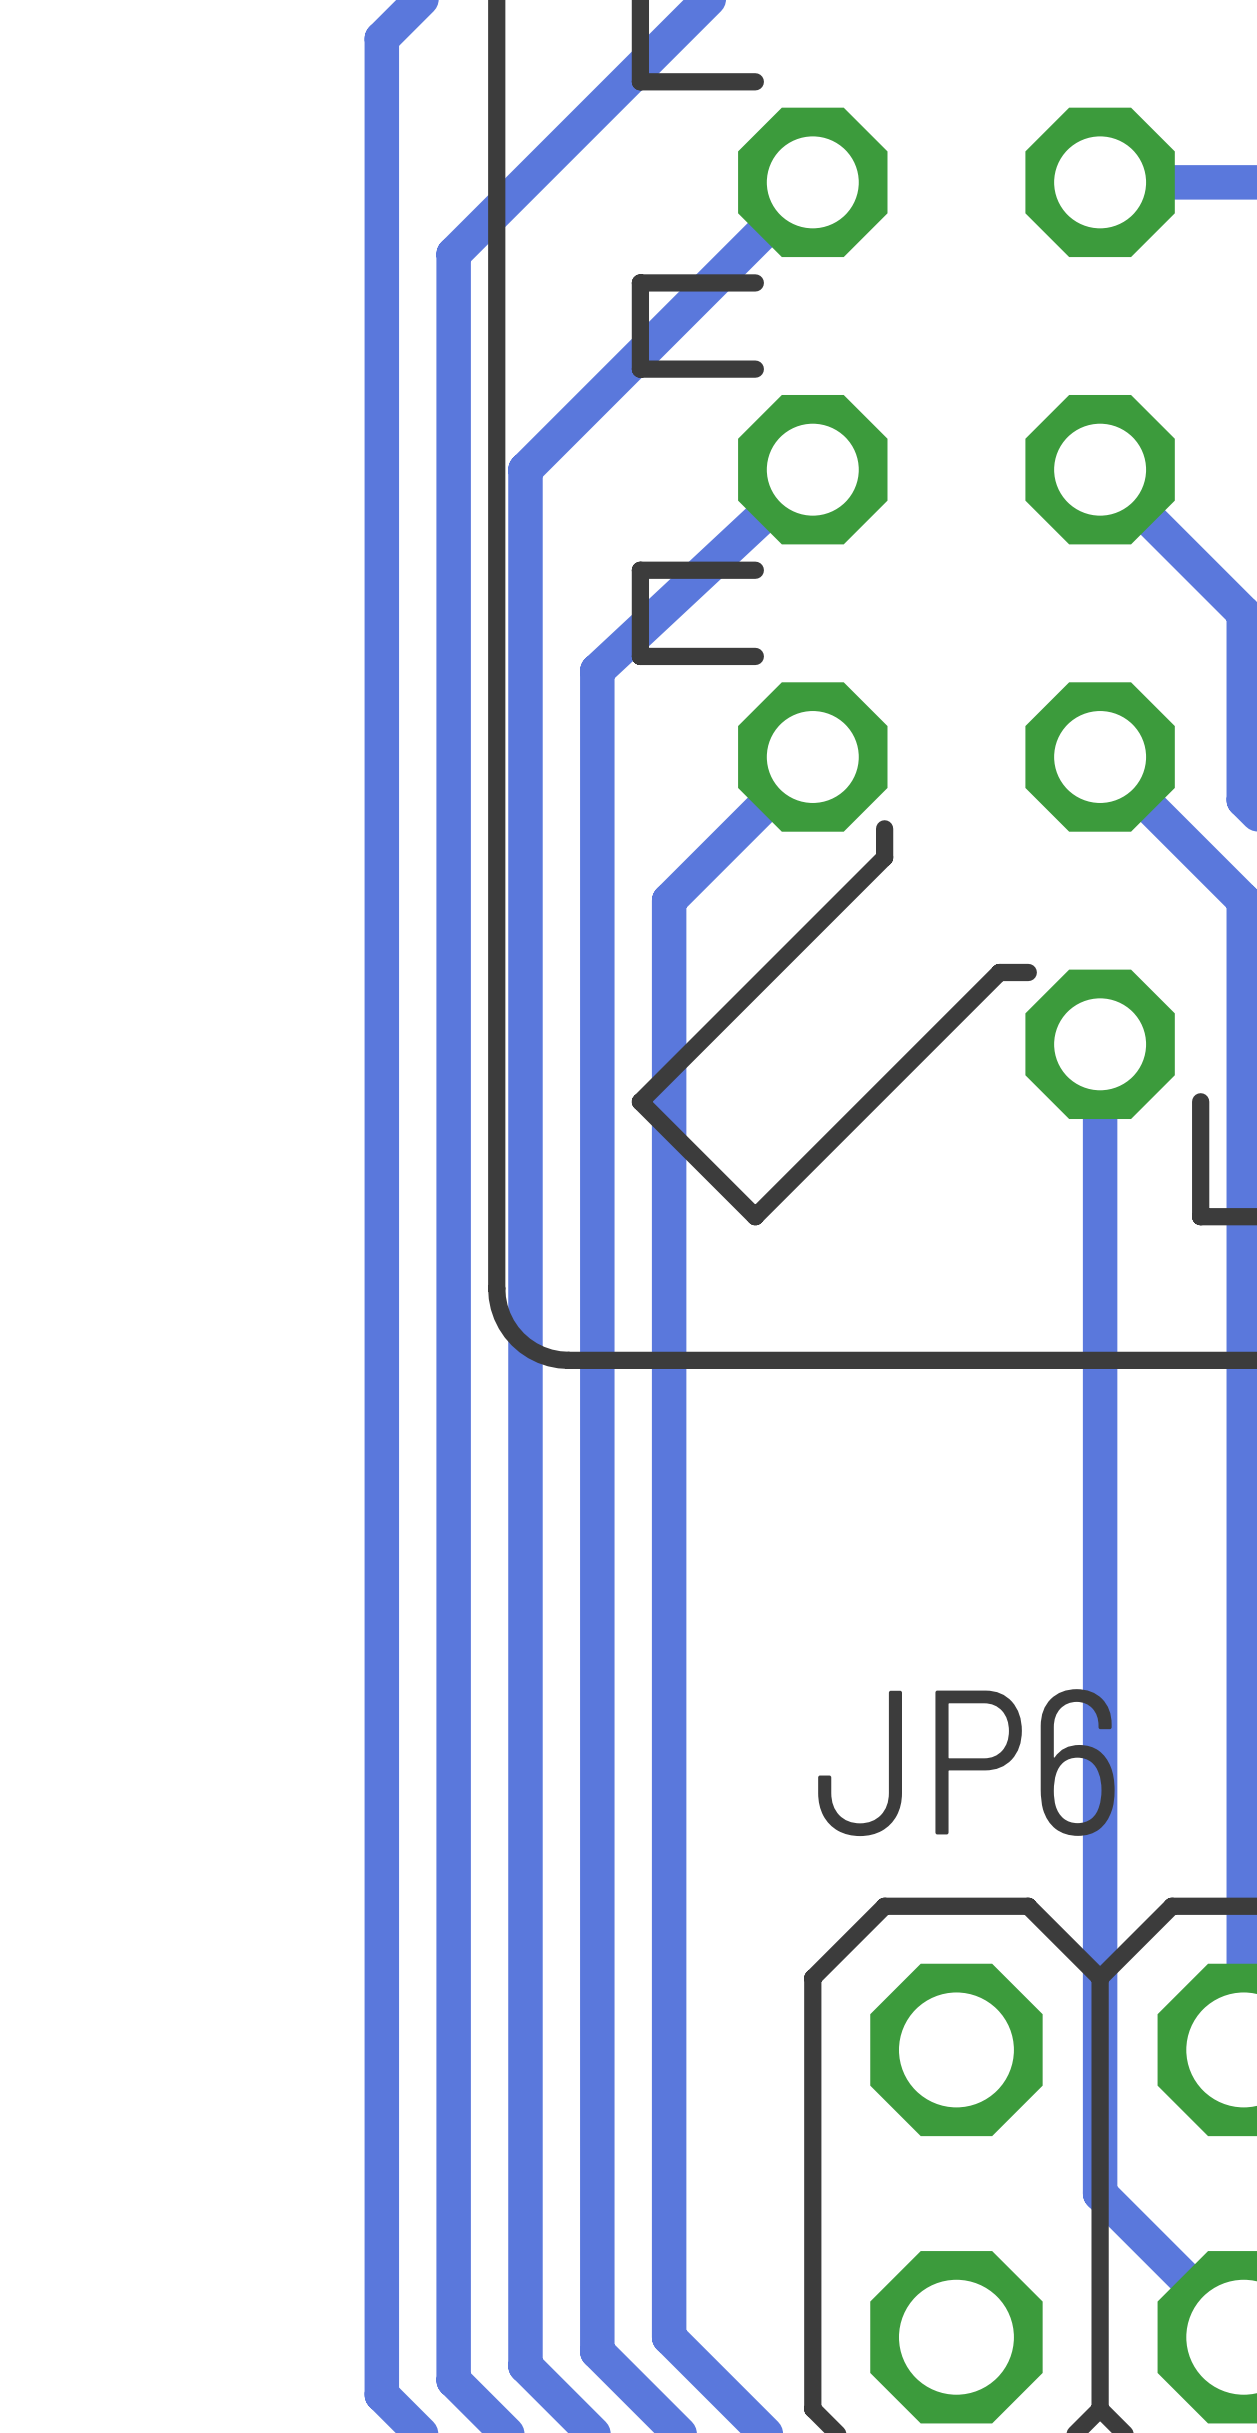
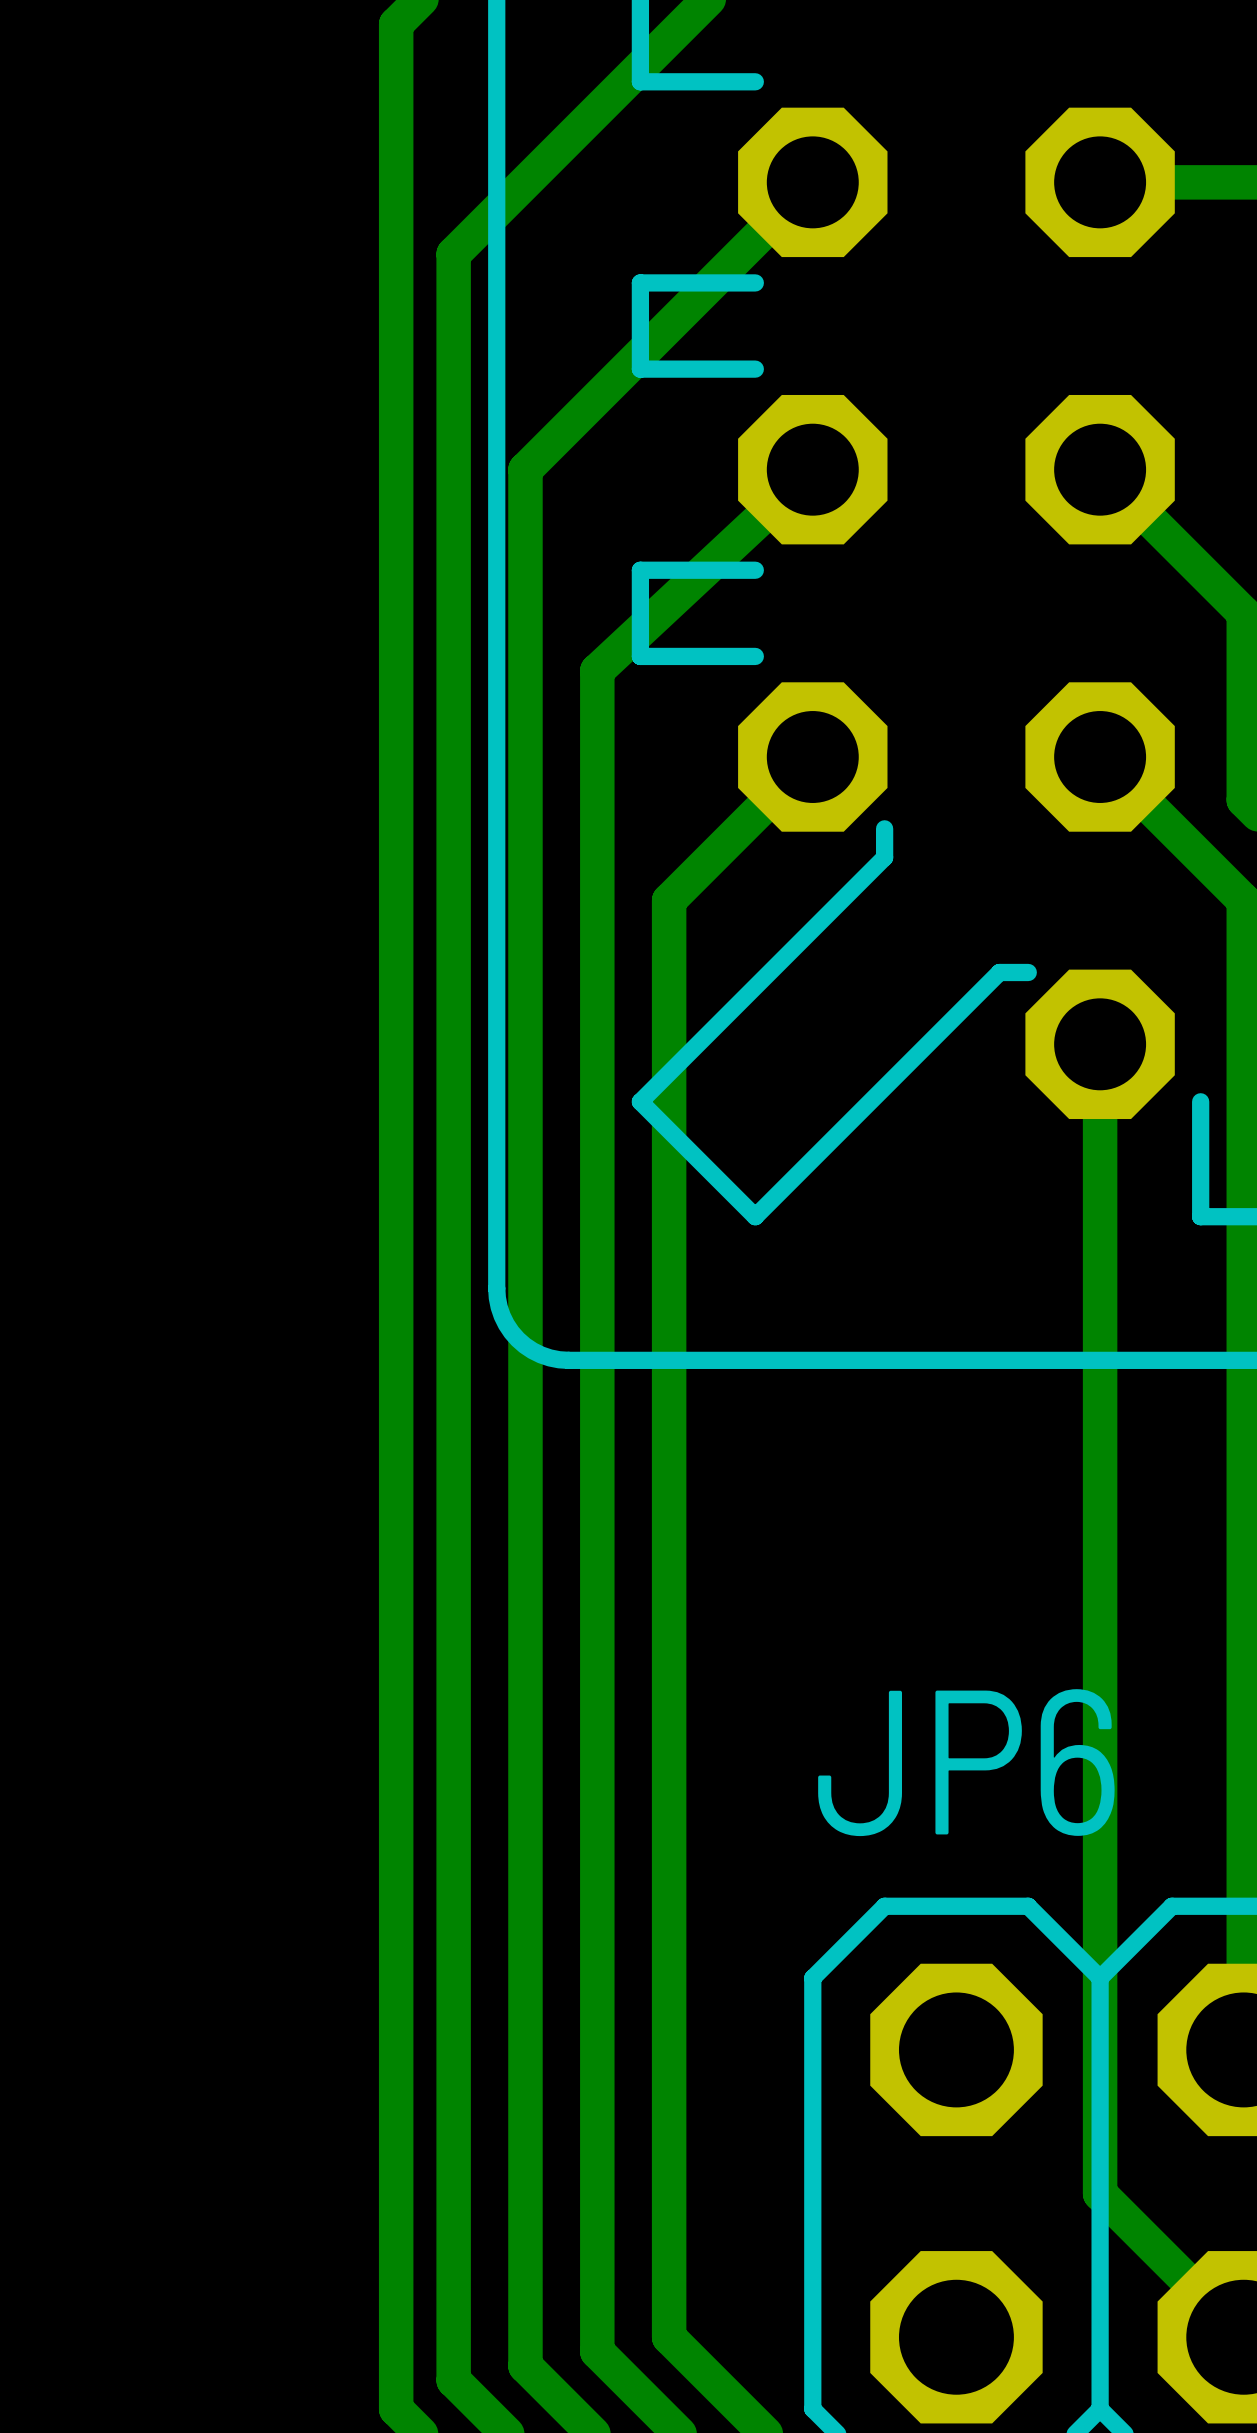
bottom track: (396, 24) (381, 38) (381, 2394) (396, 2409) -> (396, 24) (396, 2409)

